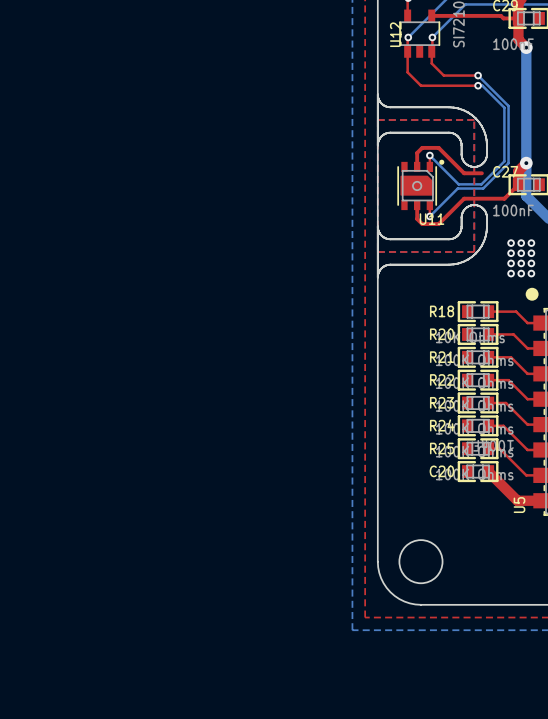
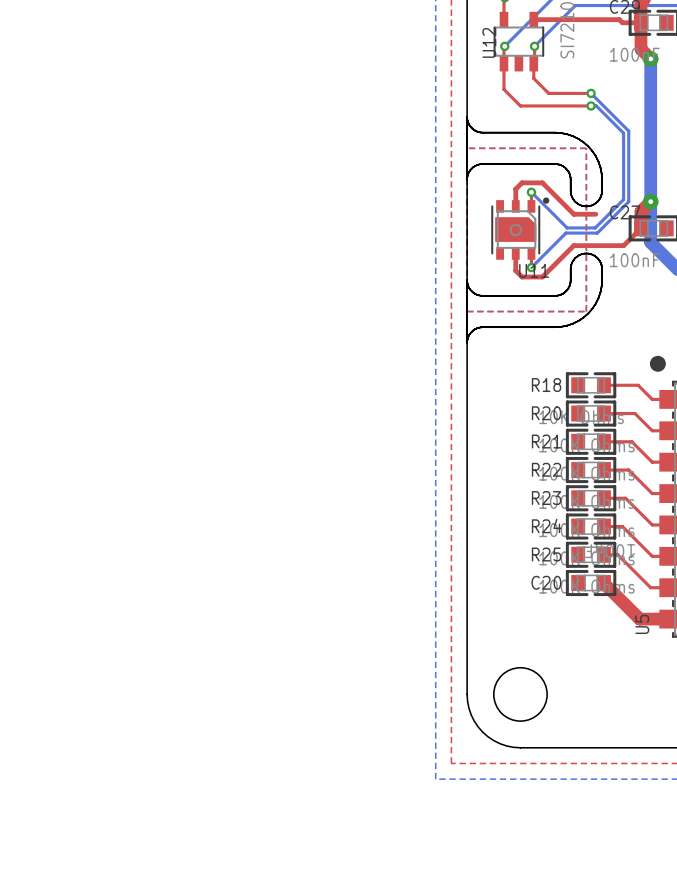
via: (511, 243) -> none
via: (521, 243) -> none
via: (531, 243) -> none
via: (511, 253) -> none
via: (521, 253) -> none
via: (531, 253) -> none
via: (511, 263) -> none
via: (521, 263) -> none
via: (531, 263) -> none
via: (511, 273) -> none
via: (521, 273) -> none
via: (531, 273) -> none

